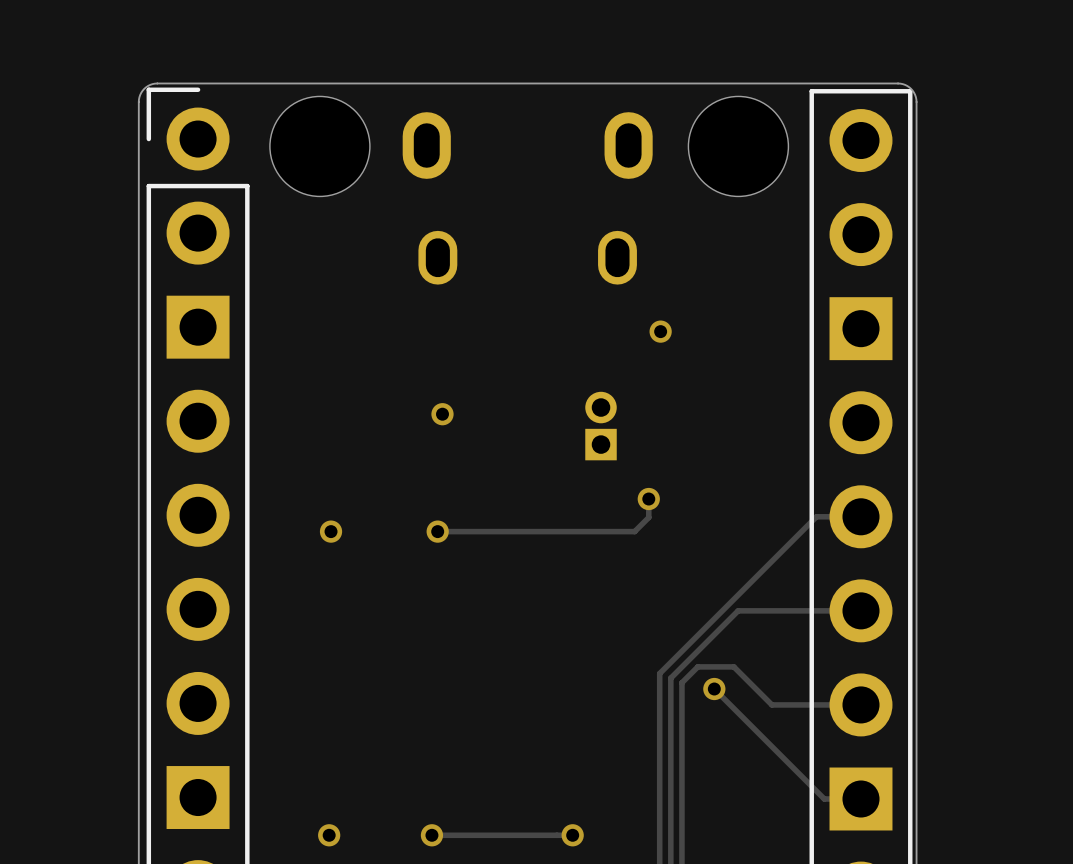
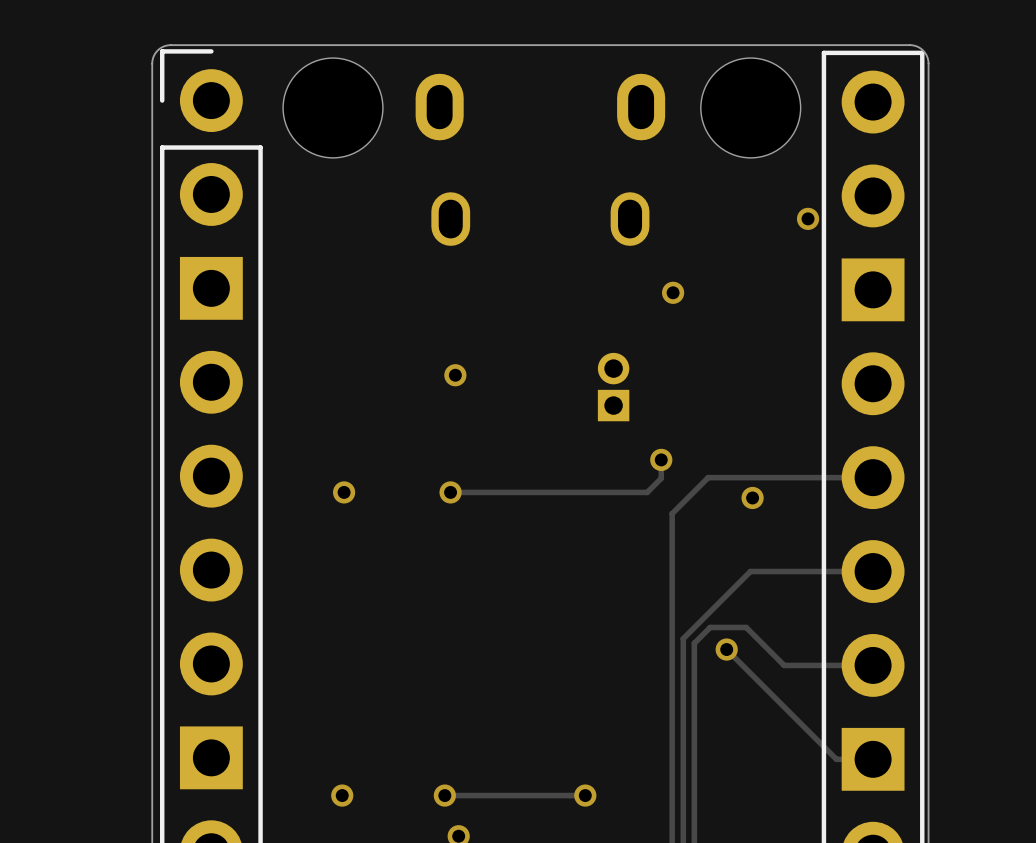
via: none -> (808, 218)
track: (816, 516) (659, 673) -> (828, 477) (708, 477) (672, 513) (672, 634)
via: none -> (752, 497)

